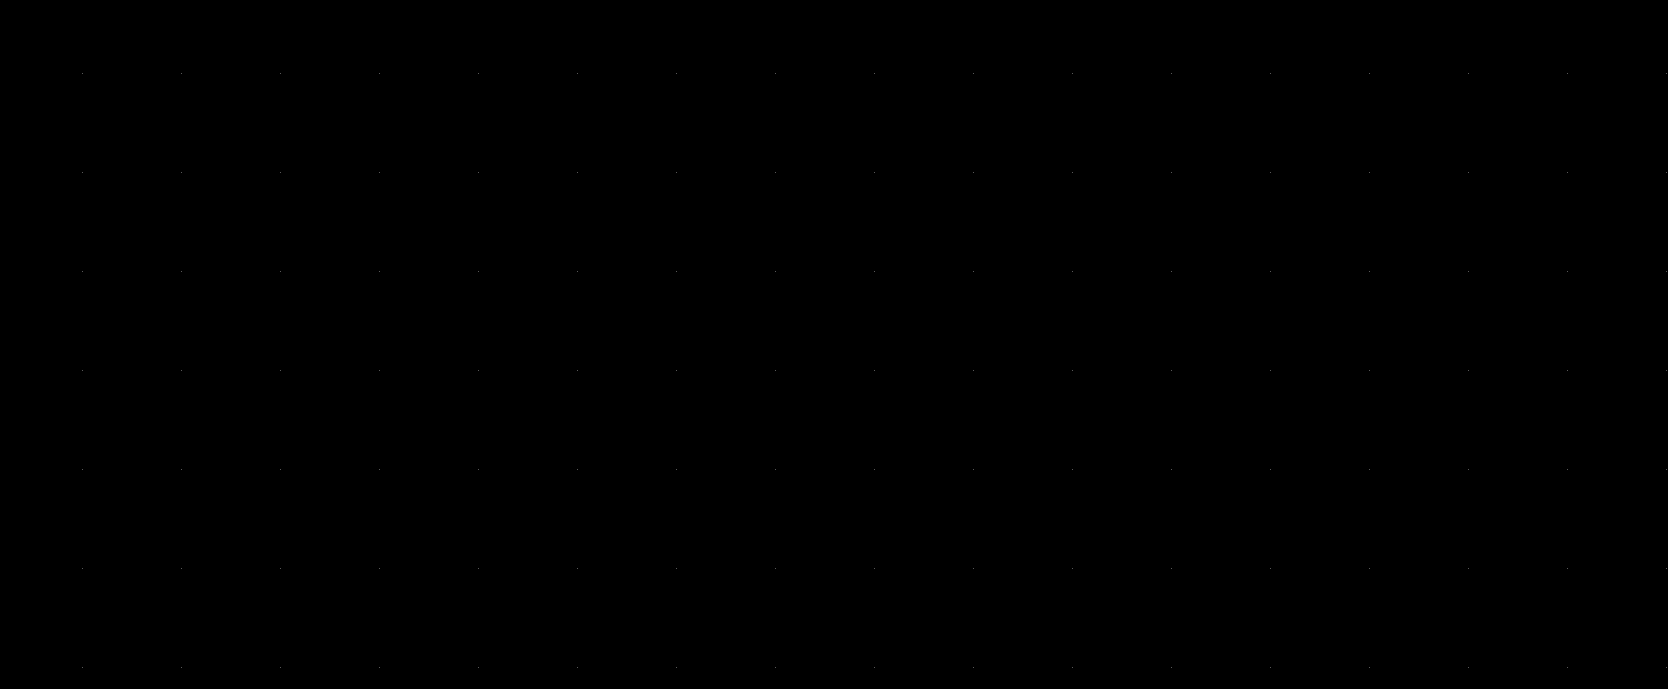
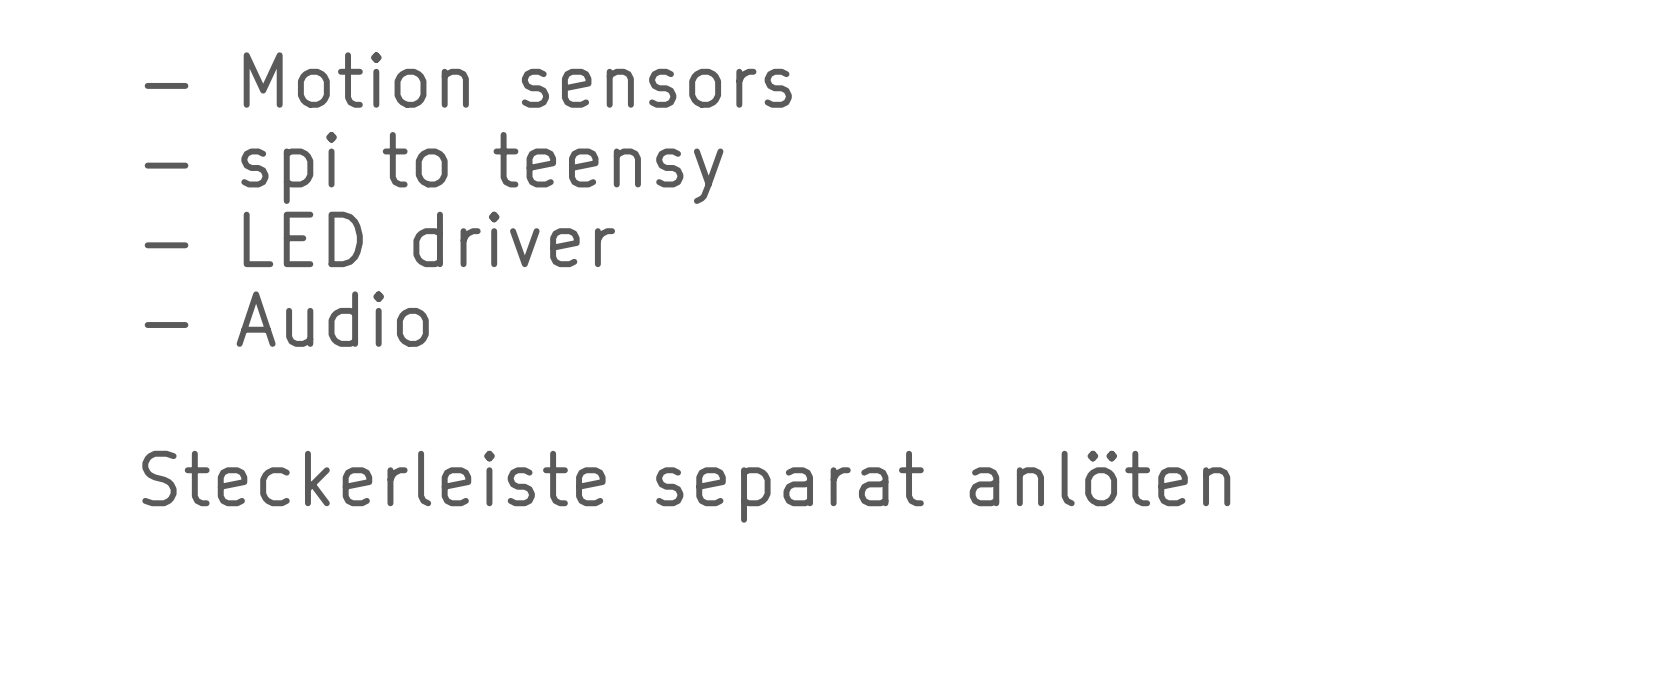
text: none -> - Motion sensors (468, 80)
text: none -> - spi to teensy (434, 167)
text: none -> - LED driver (379, 239)
text: none -> - Audio (286, 319)
text: none -> Steckerleiste separat anlöten (686, 486)

